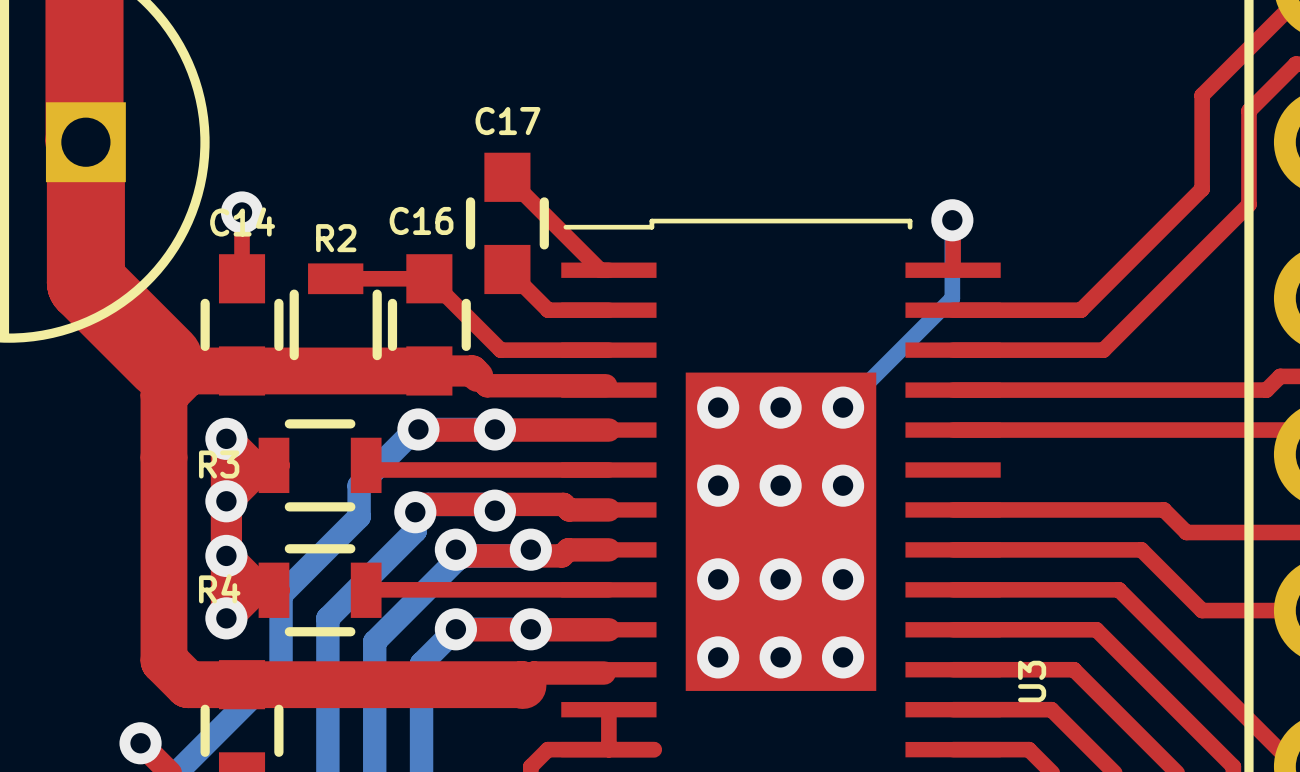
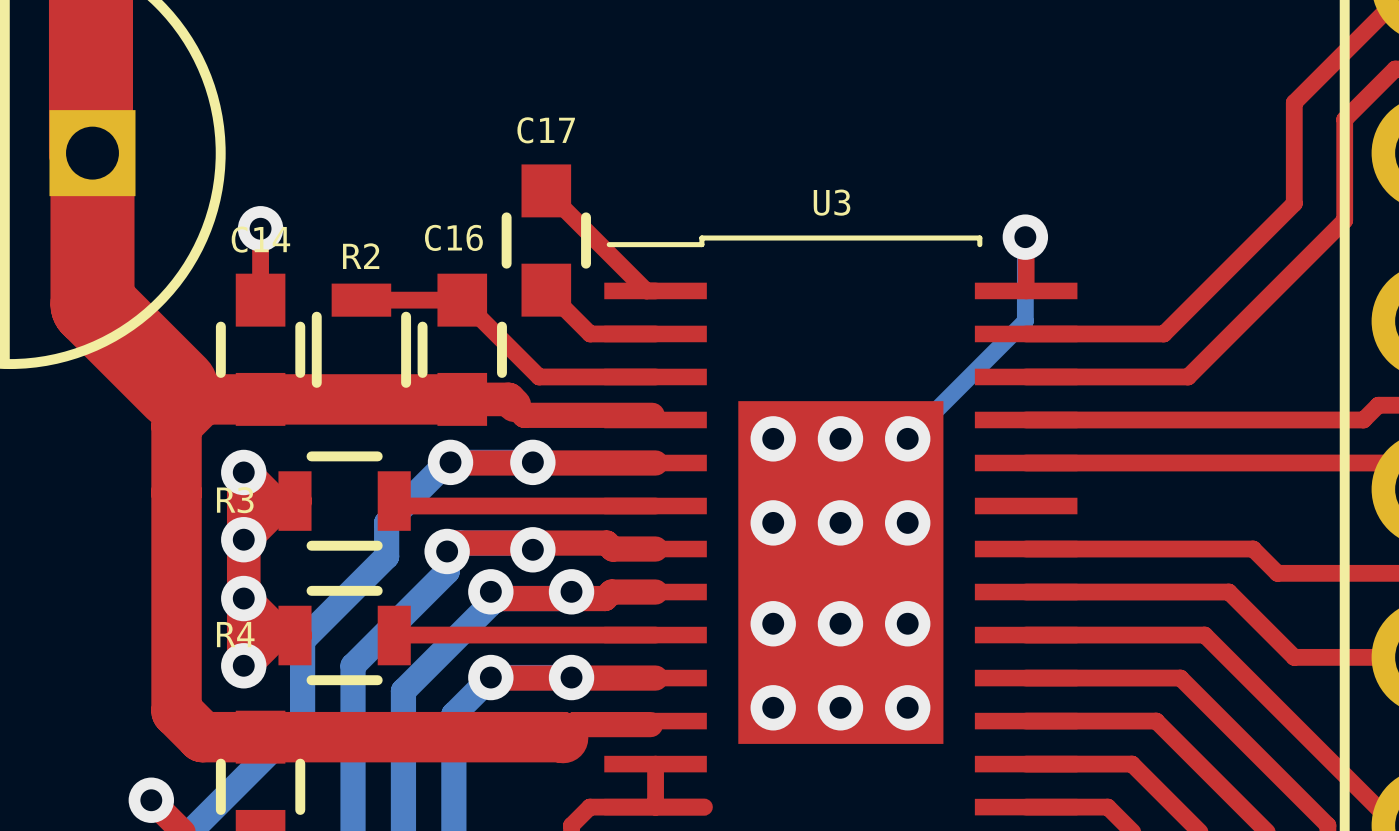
U3 name rotation: 0° (1032, 681) -> 90° clockwise (832, 202)
U3 name position: U3 (1032, 681) -> U3 (832, 202)

